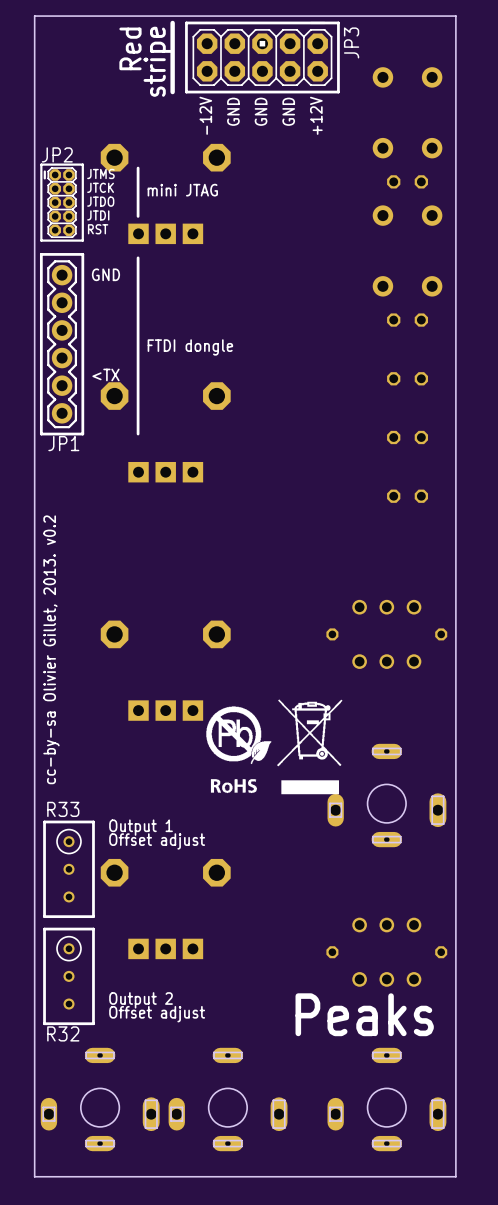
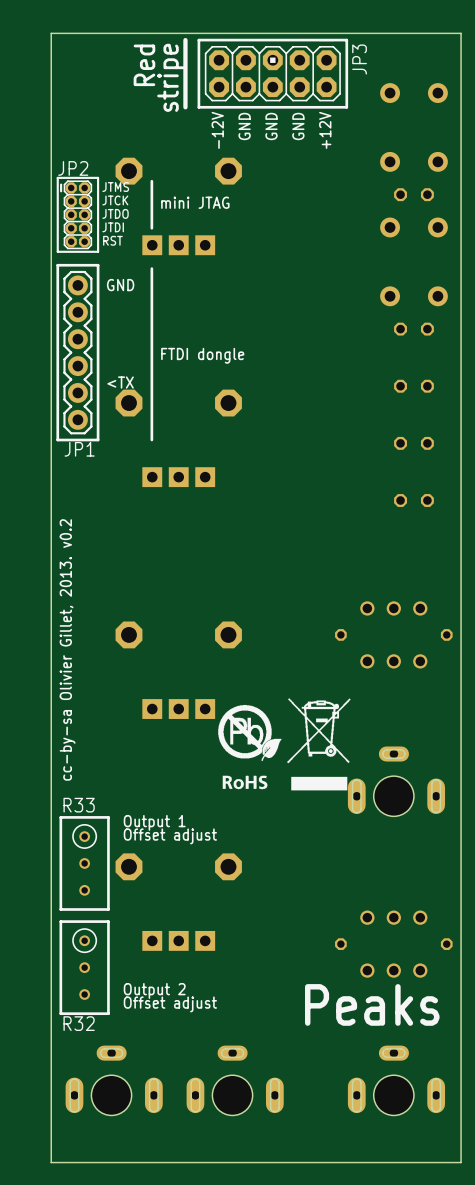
part footprint: [327, 743, 447, 848] -> [347, 746, 446, 817]
part footprint: [40, 1047, 160, 1152] -> [65, 1045, 163, 1116]
part footprint: [168, 1047, 288, 1152] -> [186, 1045, 284, 1116]
part footprint: [327, 1047, 447, 1152] -> [347, 1045, 446, 1116]

